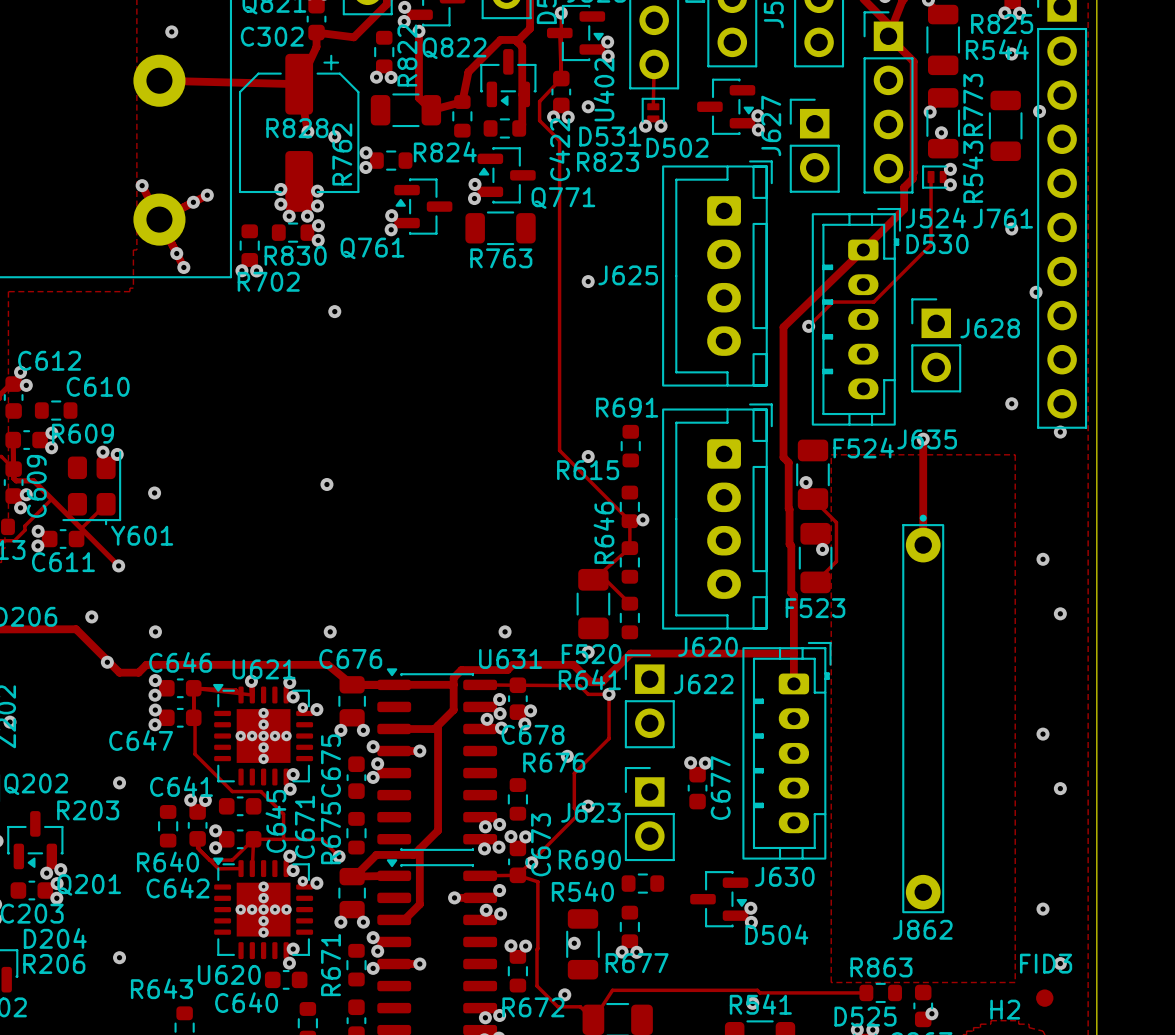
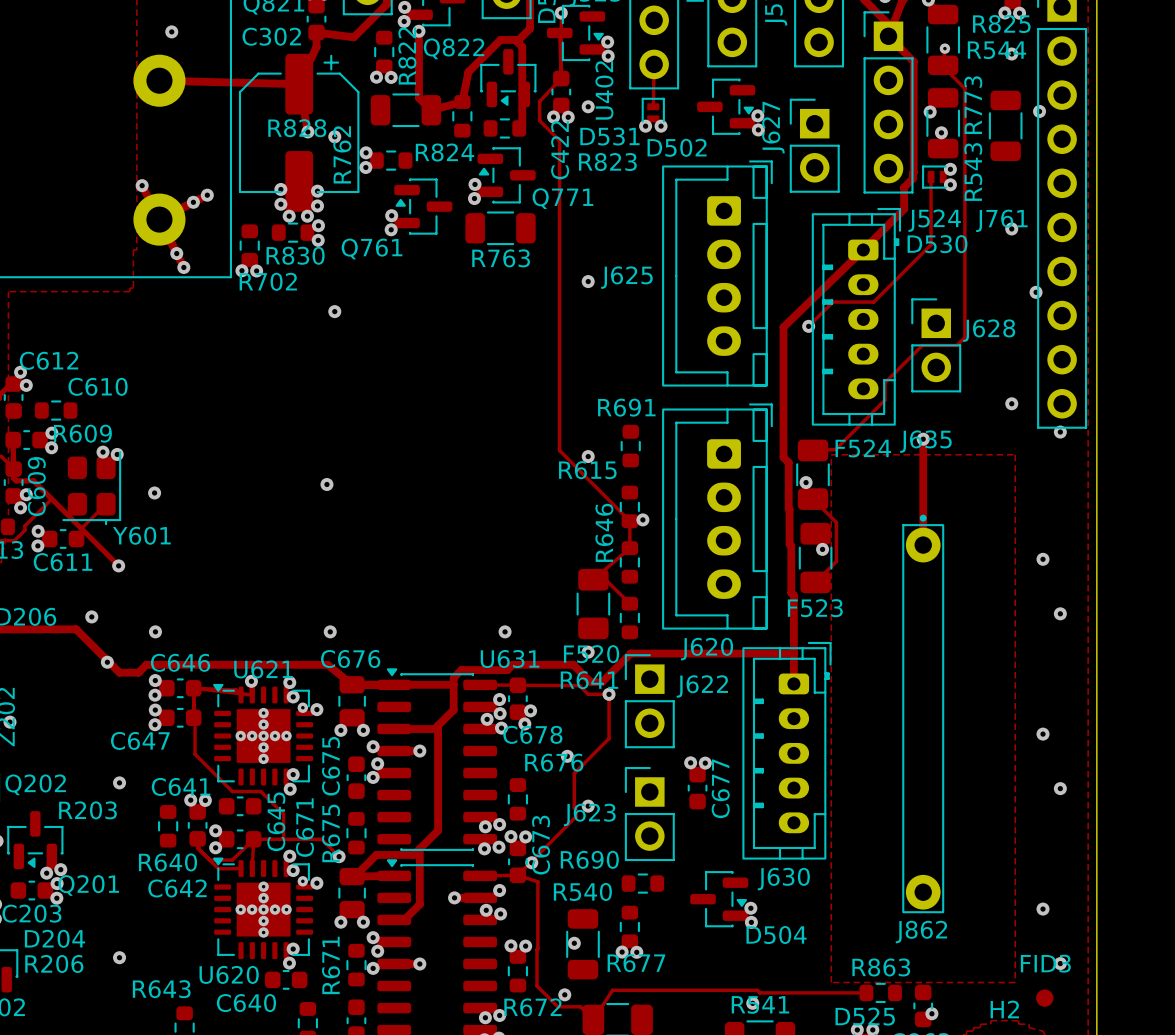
track: none -> (944, 48) (943, 66) (964, 88) (964, 337) (957, 345) (922, 345) (885, 382) (885, 400) (835, 449) (813, 450)
via: none -> (944, 48)

